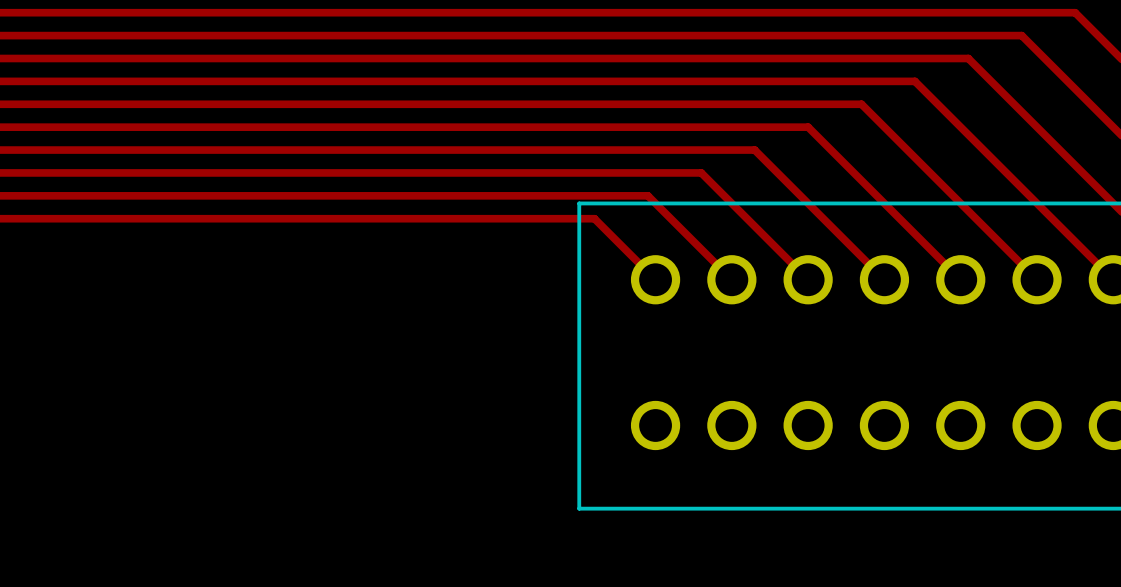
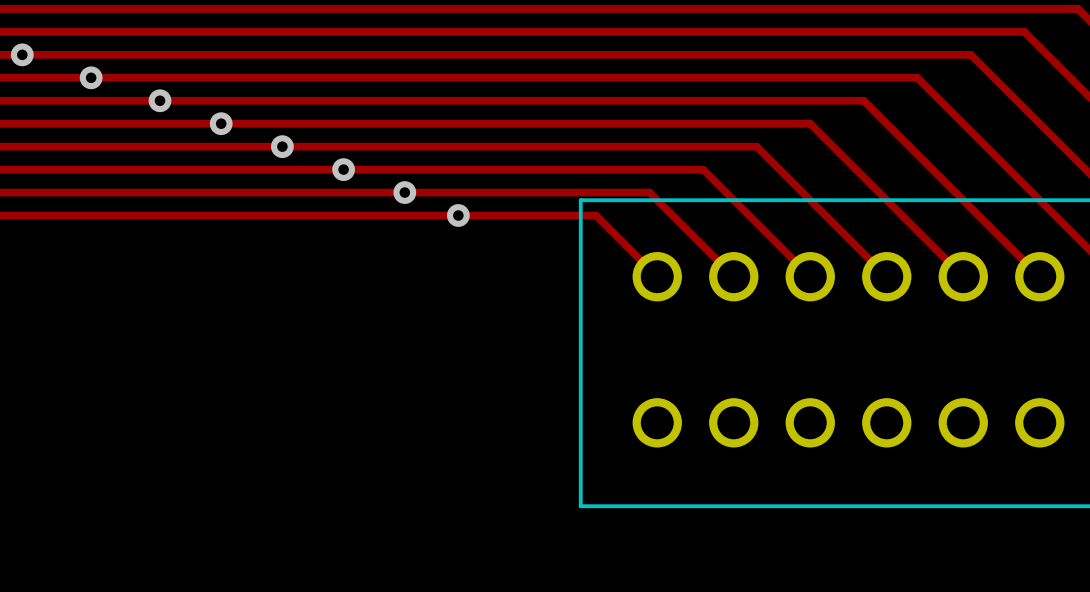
via: none -> (22, 54)
via: none -> (91, 77)
via: none -> (160, 100)
via: none -> (221, 123)
via: none -> (282, 146)
via: none -> (343, 169)
via: none -> (404, 192)
via: none -> (458, 215)

